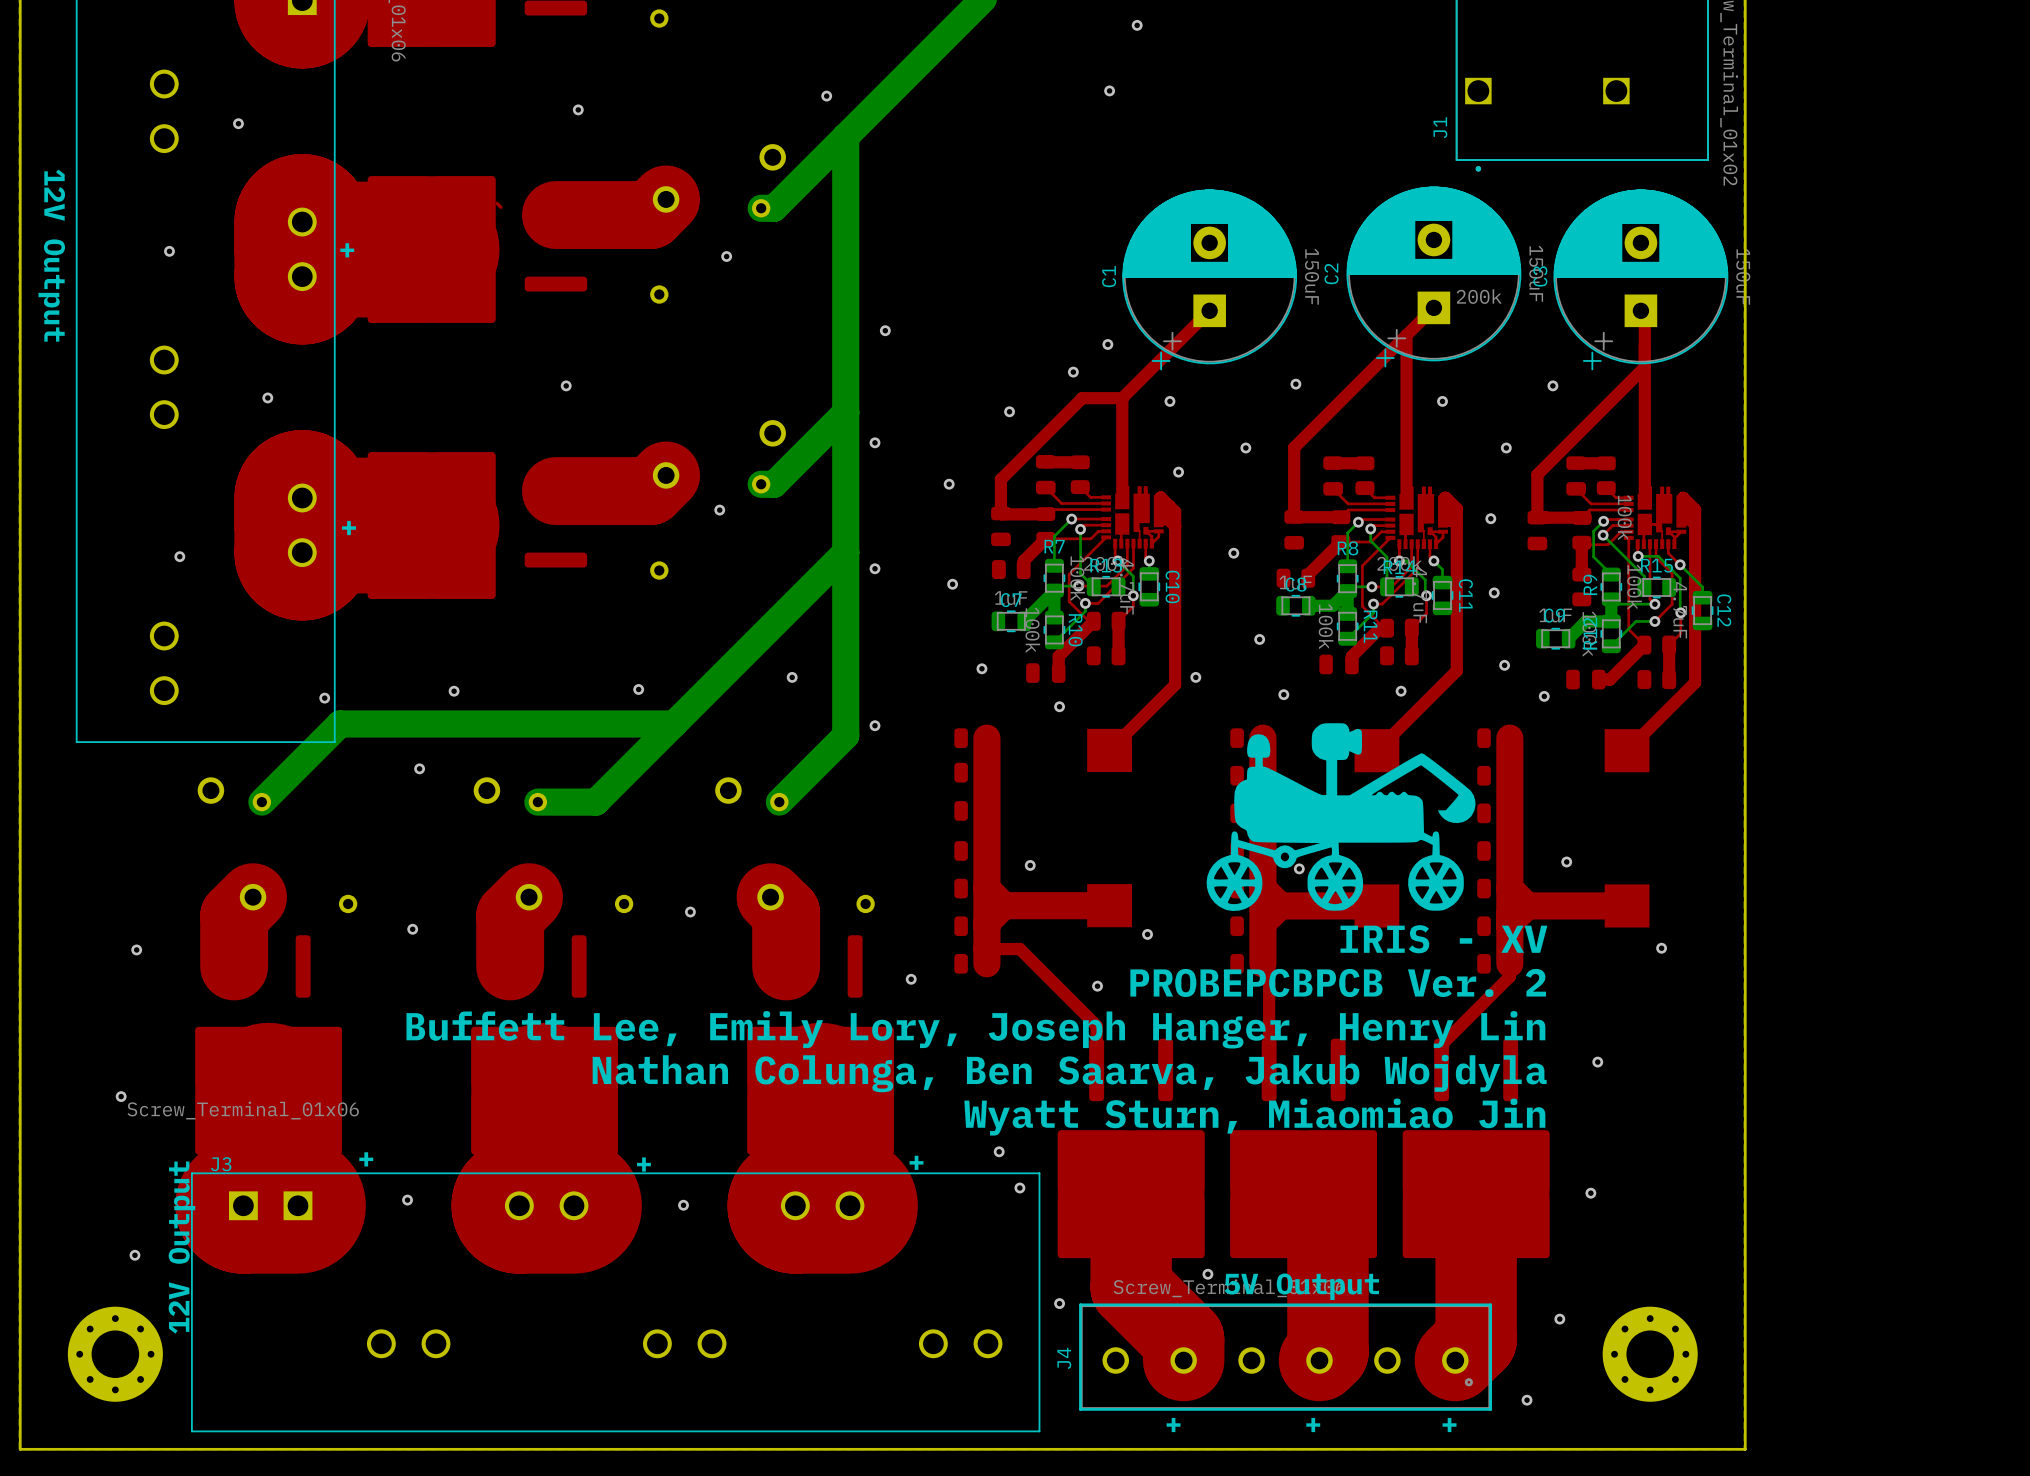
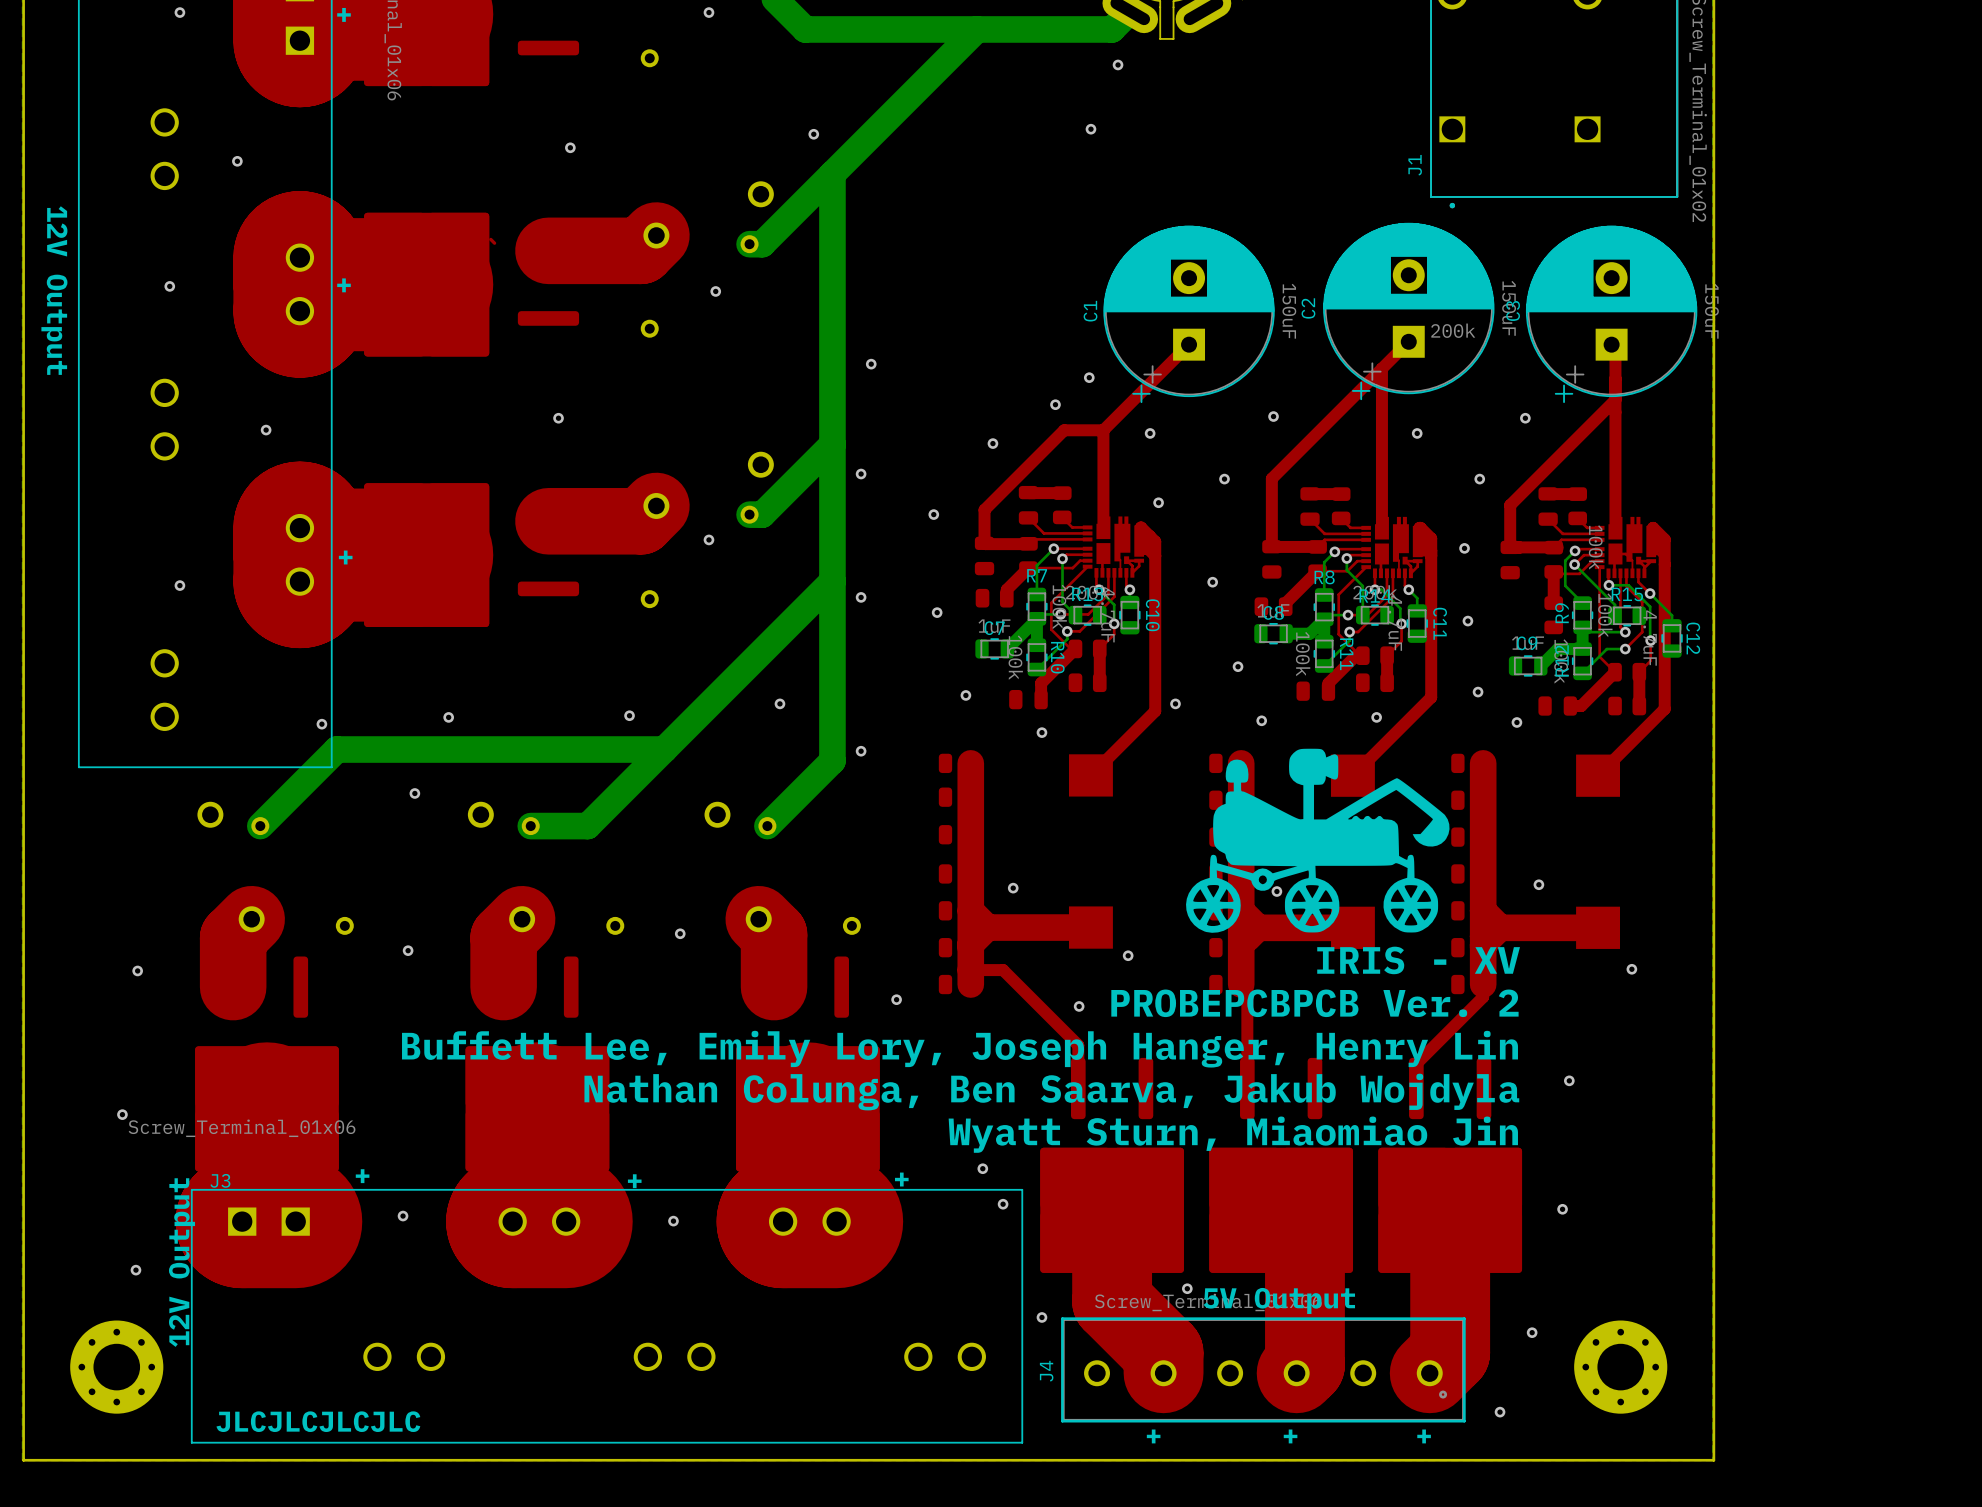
text: none -> JLCJLCJLCJLC (318, 1421)

